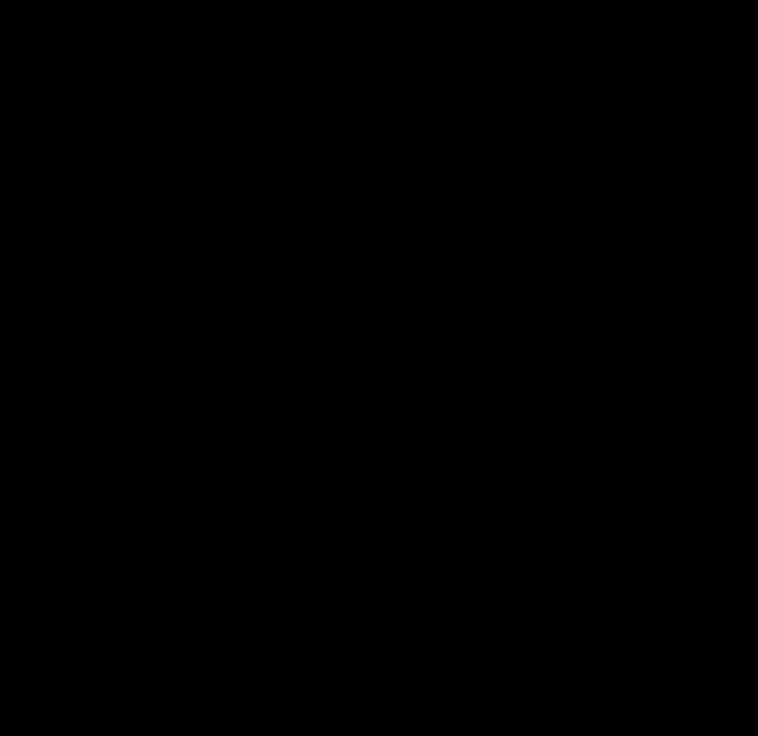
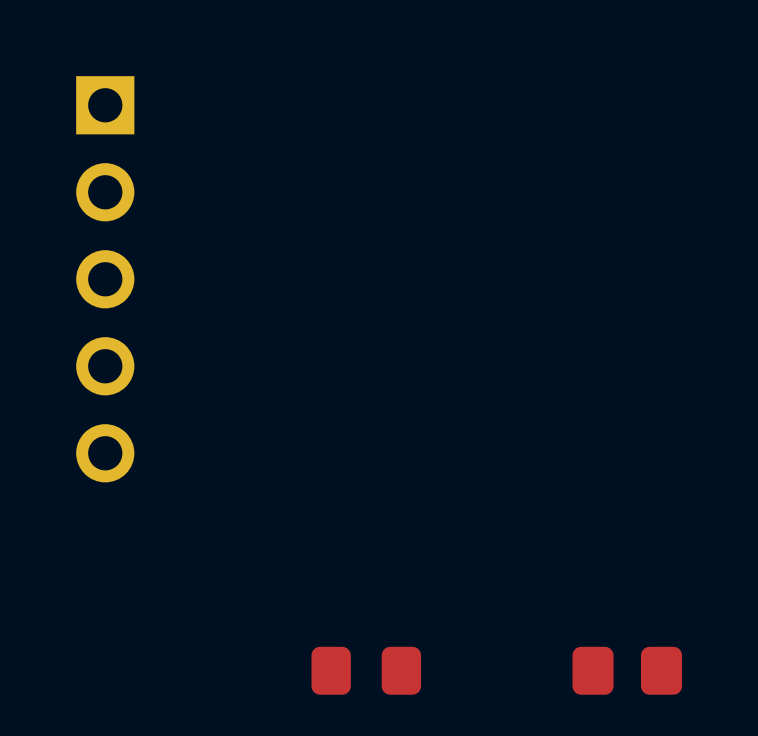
part: none -> (105, 279)
part: none -> (366, 670)
part: none -> (627, 670)

